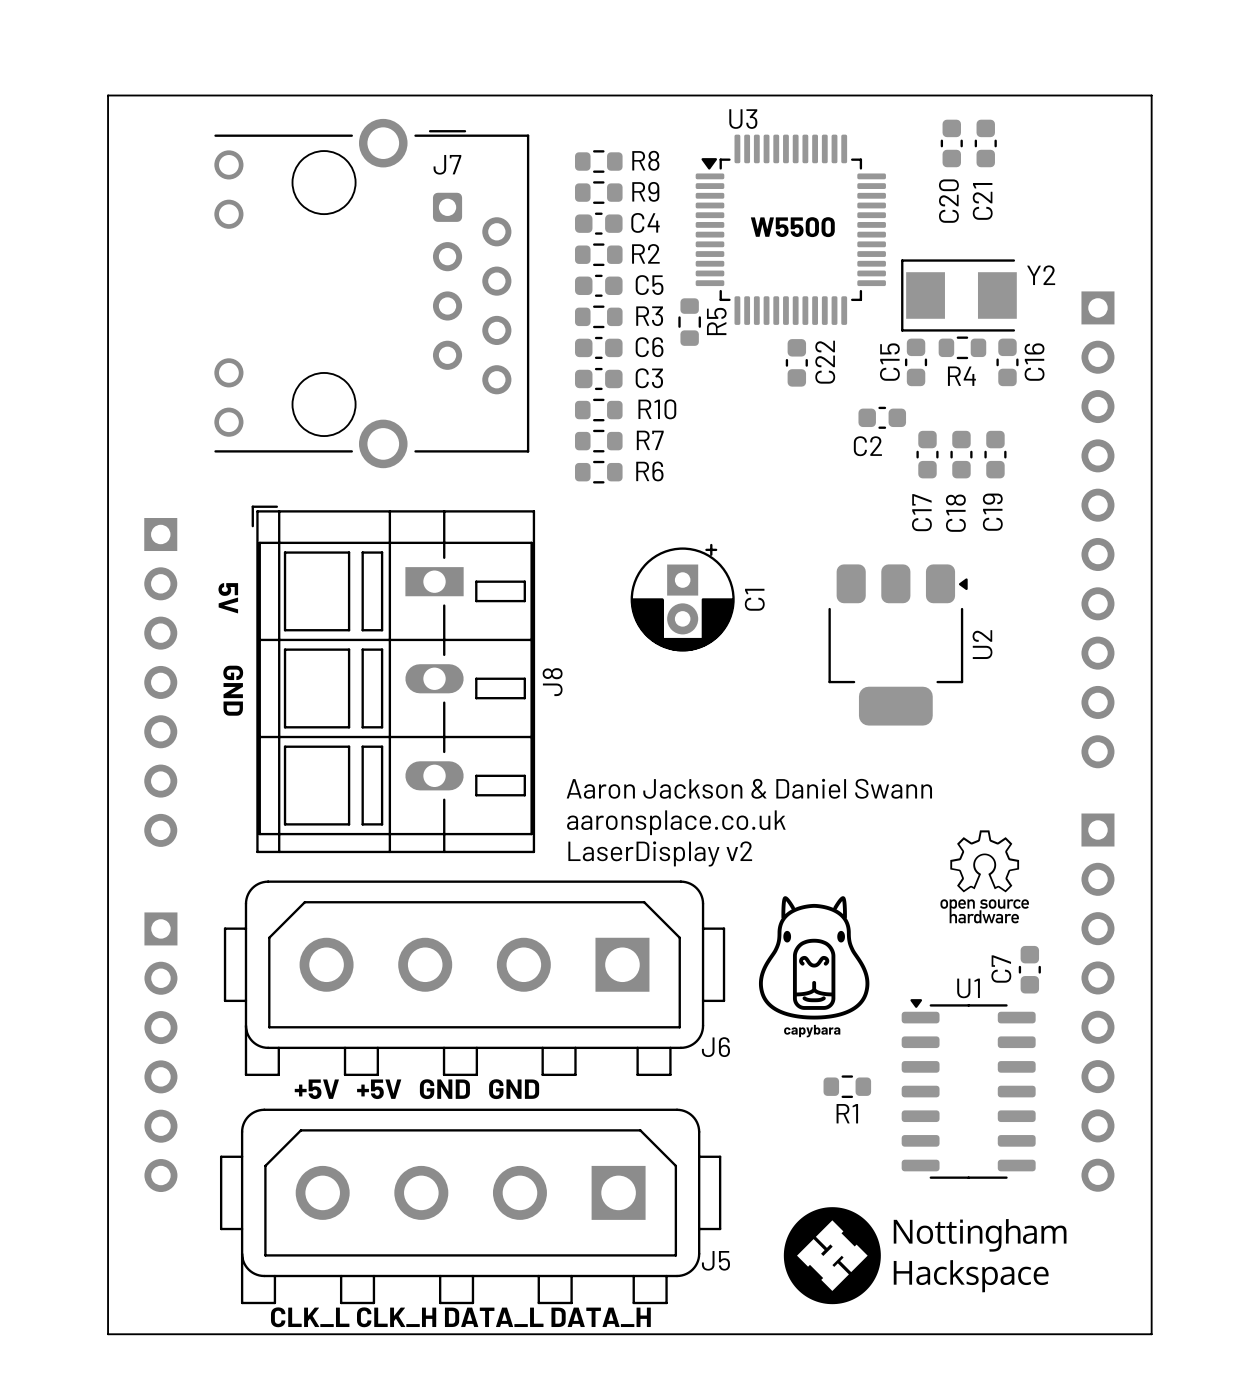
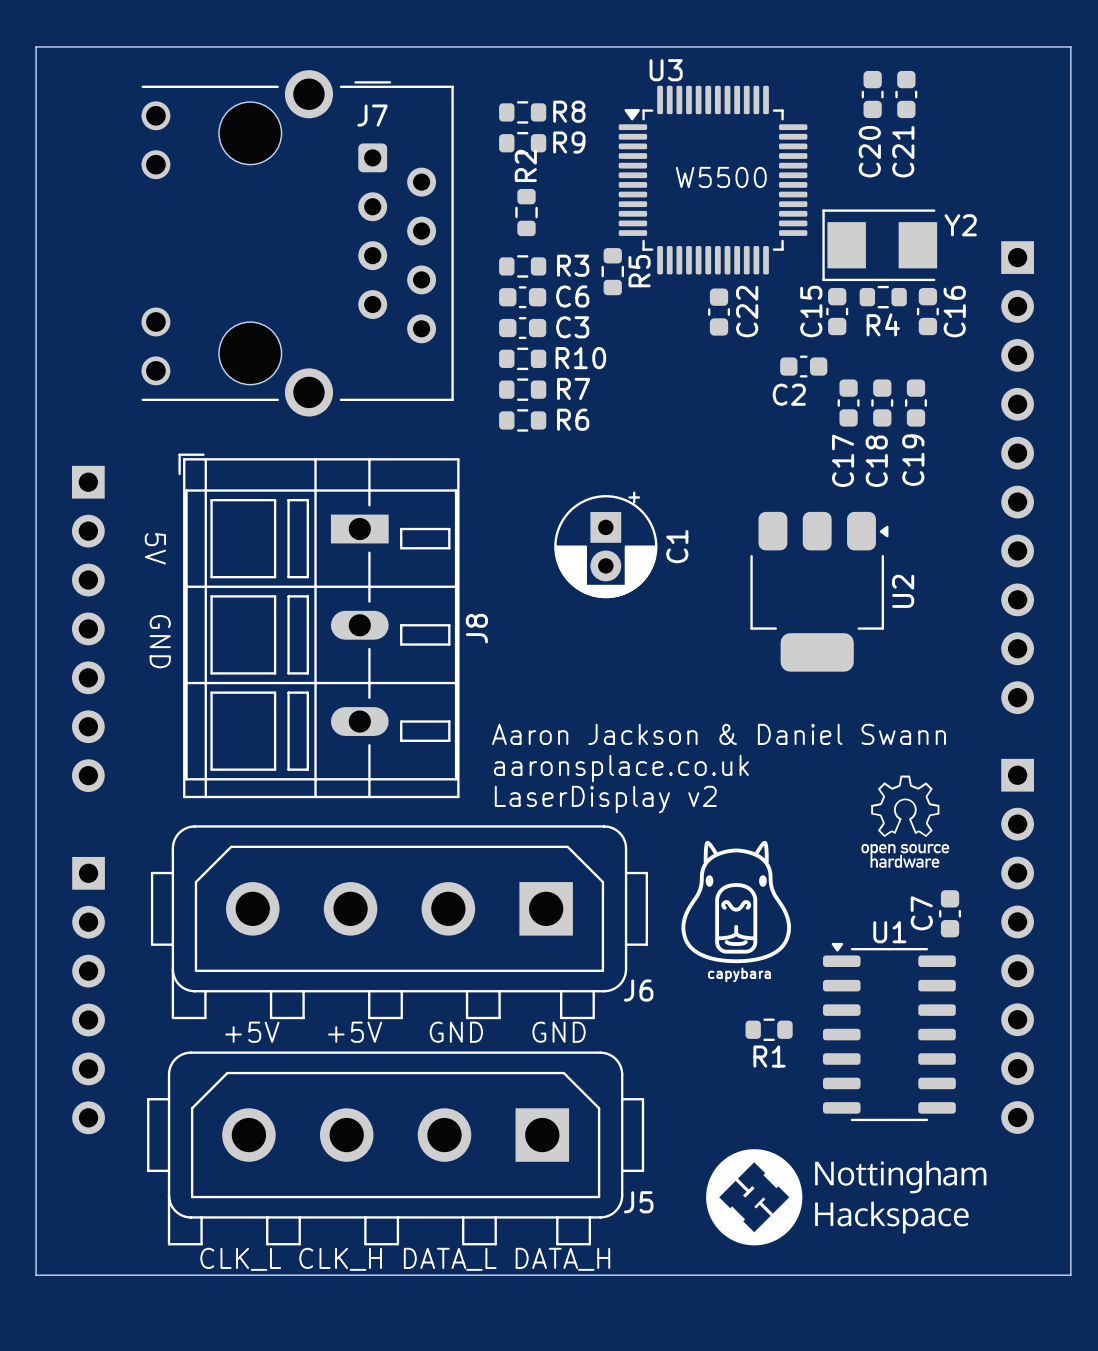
C4: (598, 223) -> none
R2 name position: R2 (645, 253) -> R2 (525, 165)
R2 rotation: 0° (598, 254) -> 90° clockwise (526, 212)
C5: (598, 285) -> none

